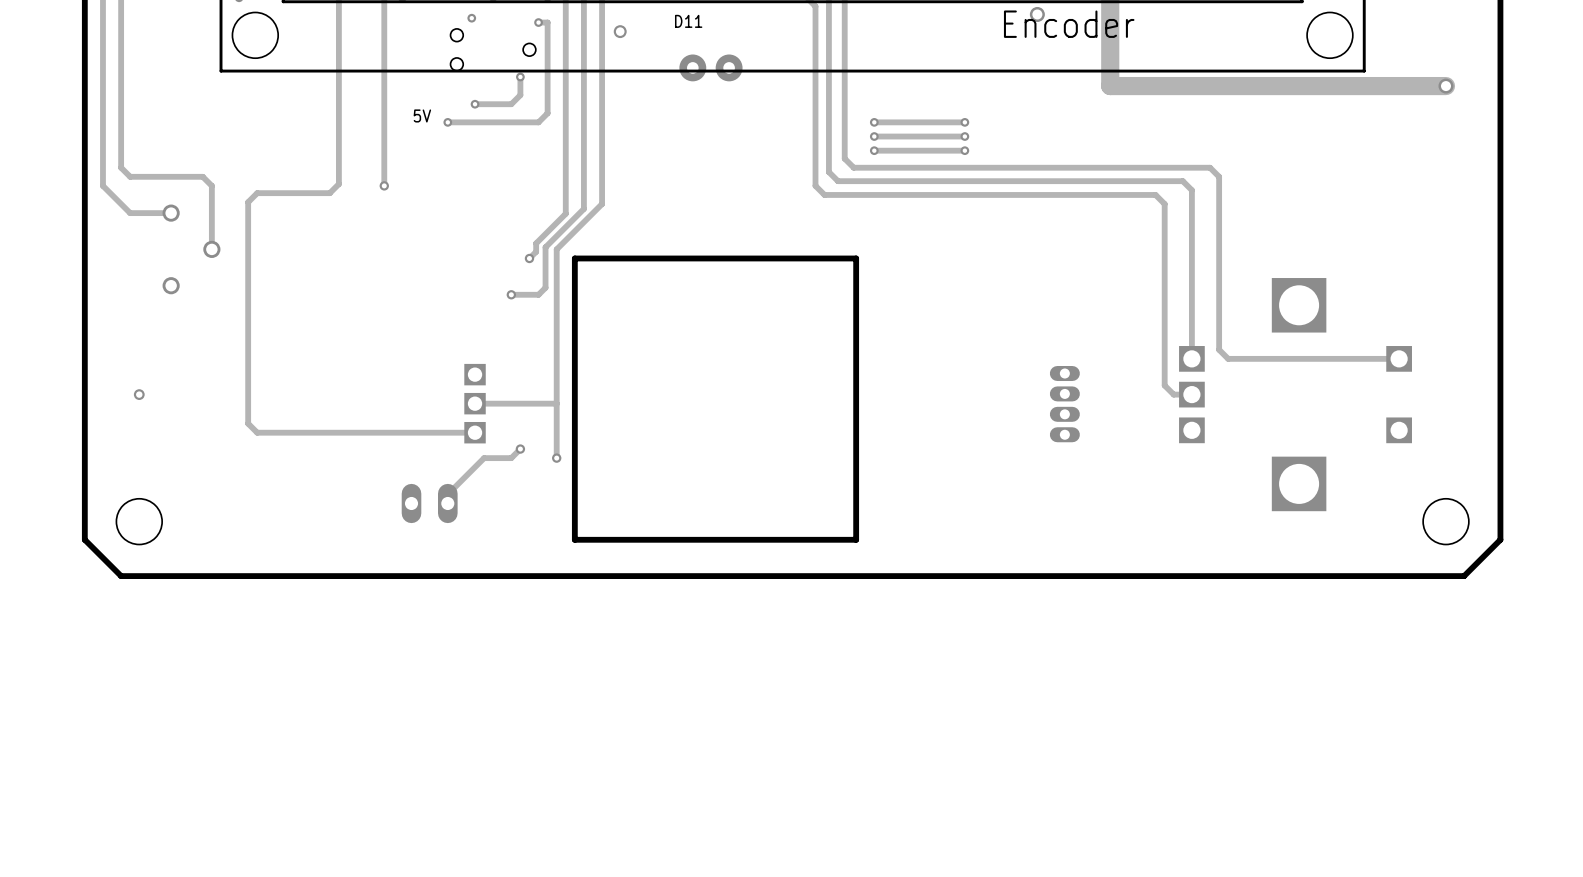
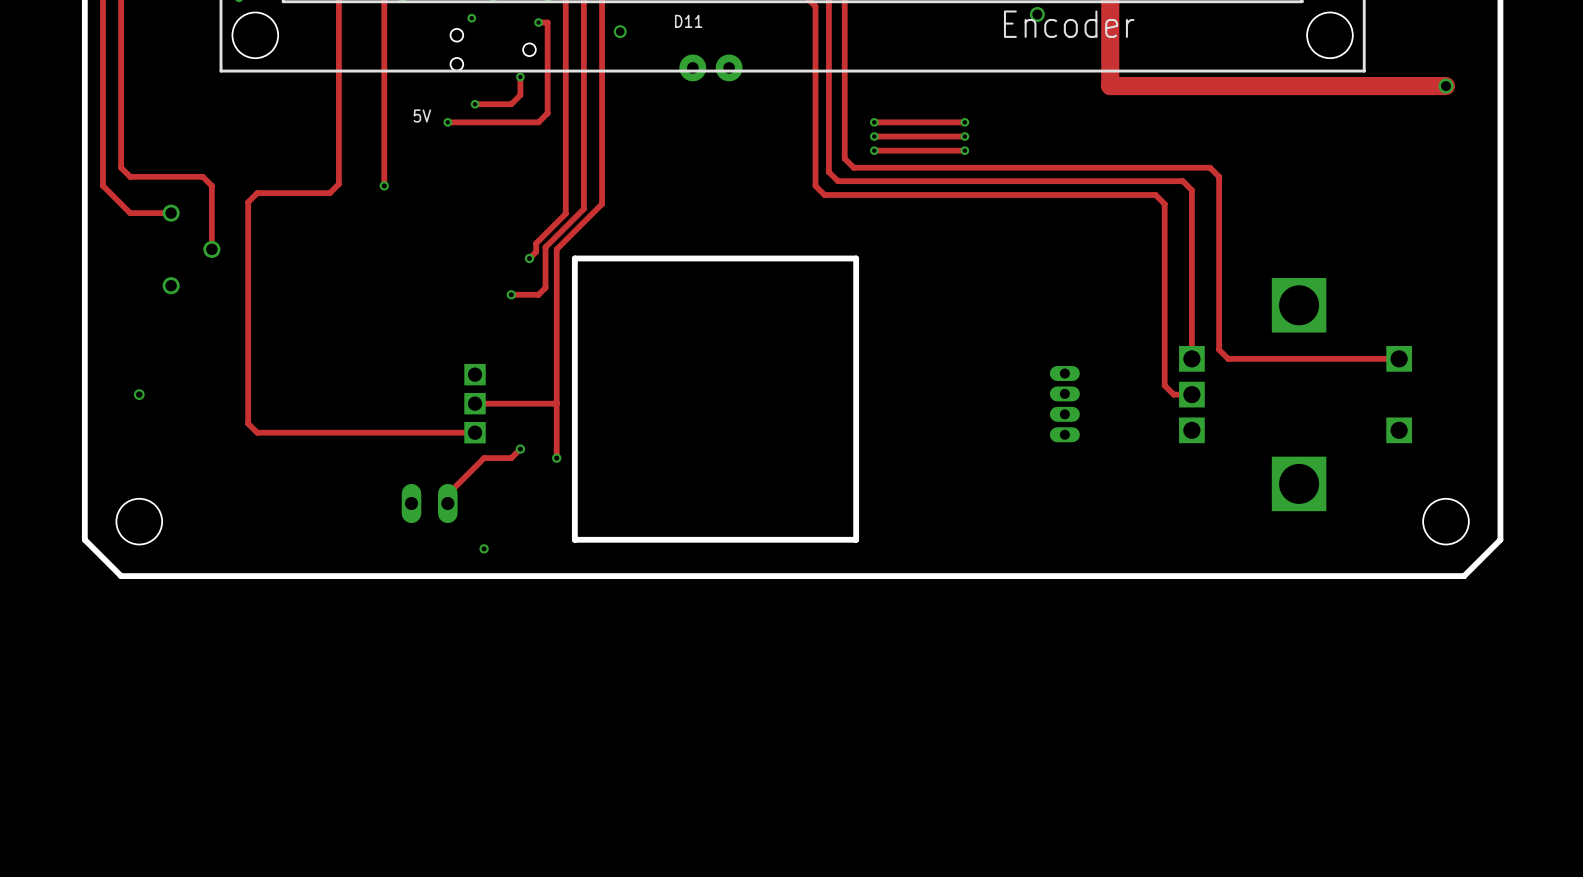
via: none -> (484, 548)

